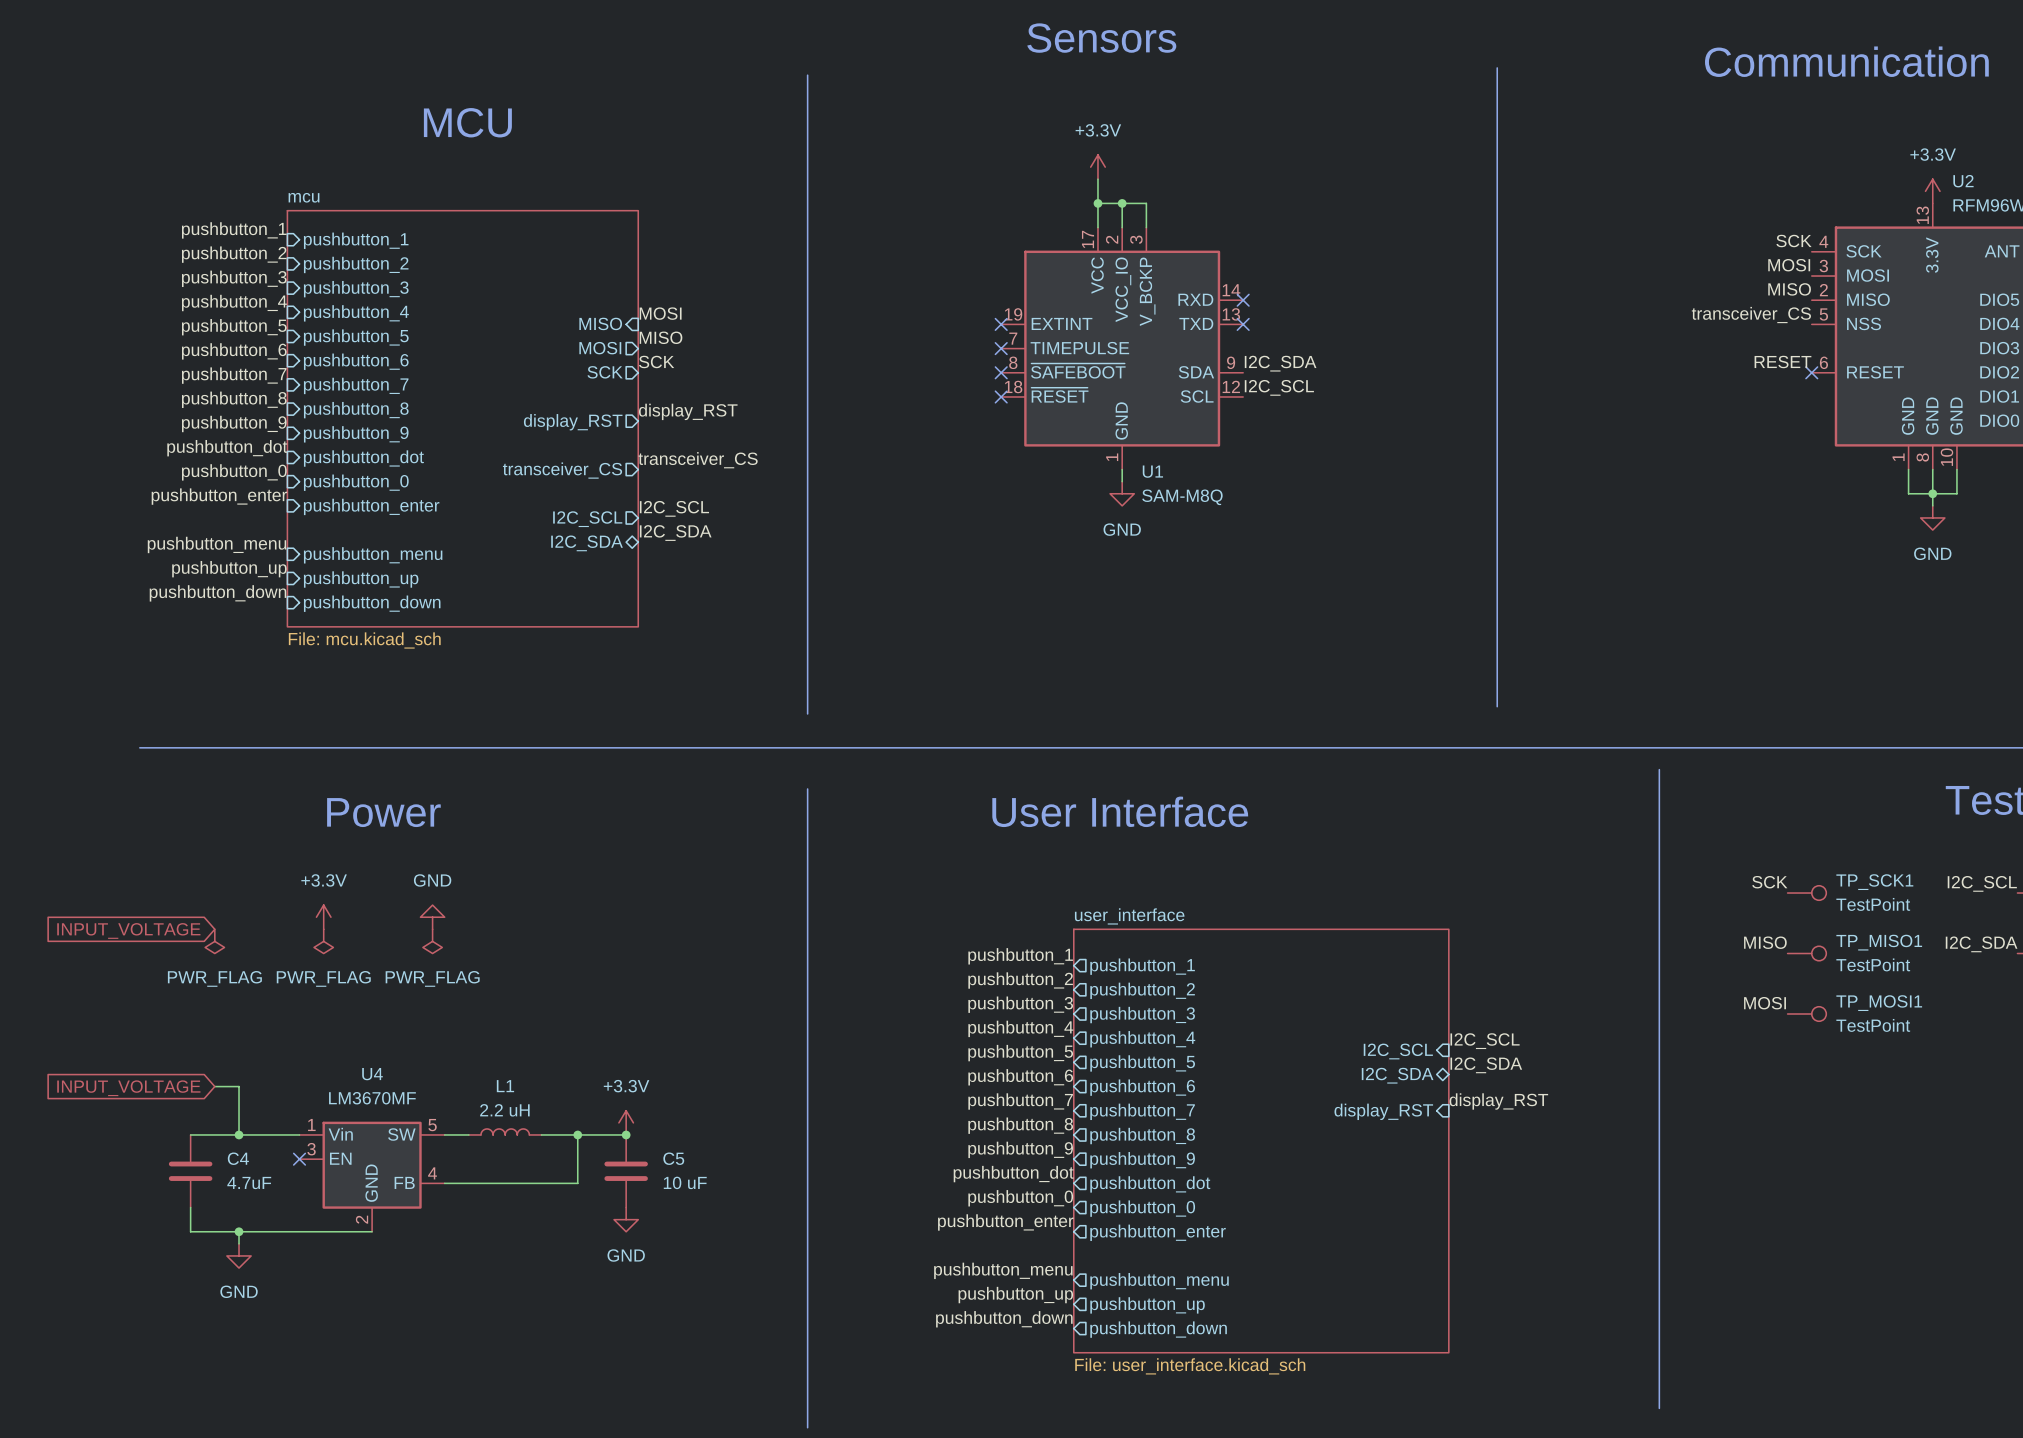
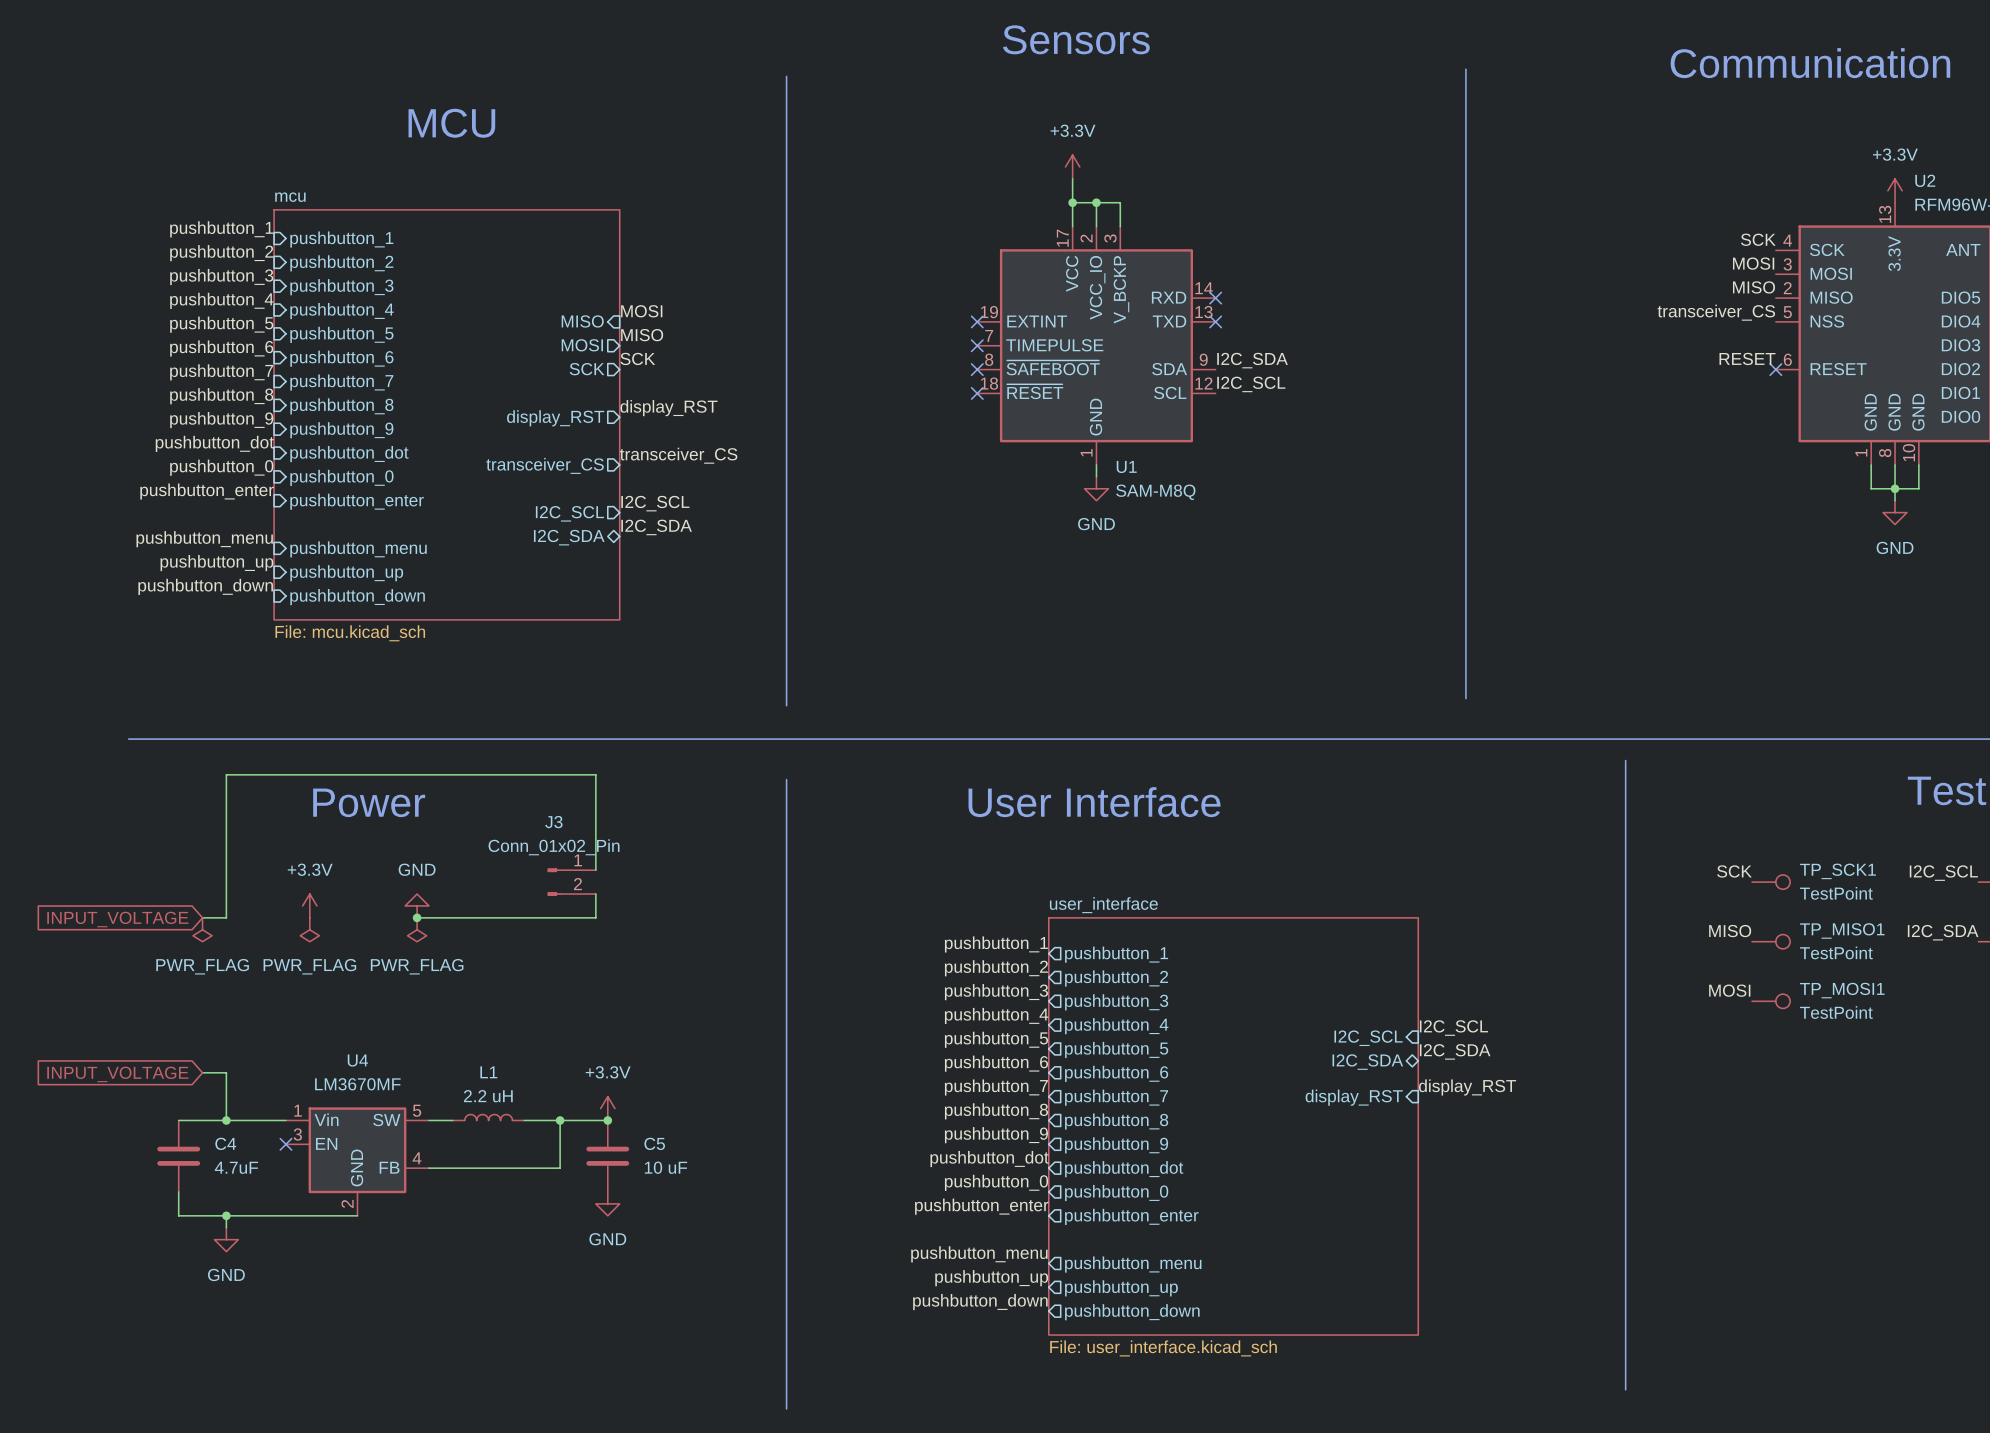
wire: none -> (595, 870) (595, 774) (226, 774) (226, 917) (202, 917)
J3: none -> Conn_01x02_Pin (571, 882)
wire: none -> (595, 894) (595, 917) (417, 917)
junction: none -> (417, 917)

